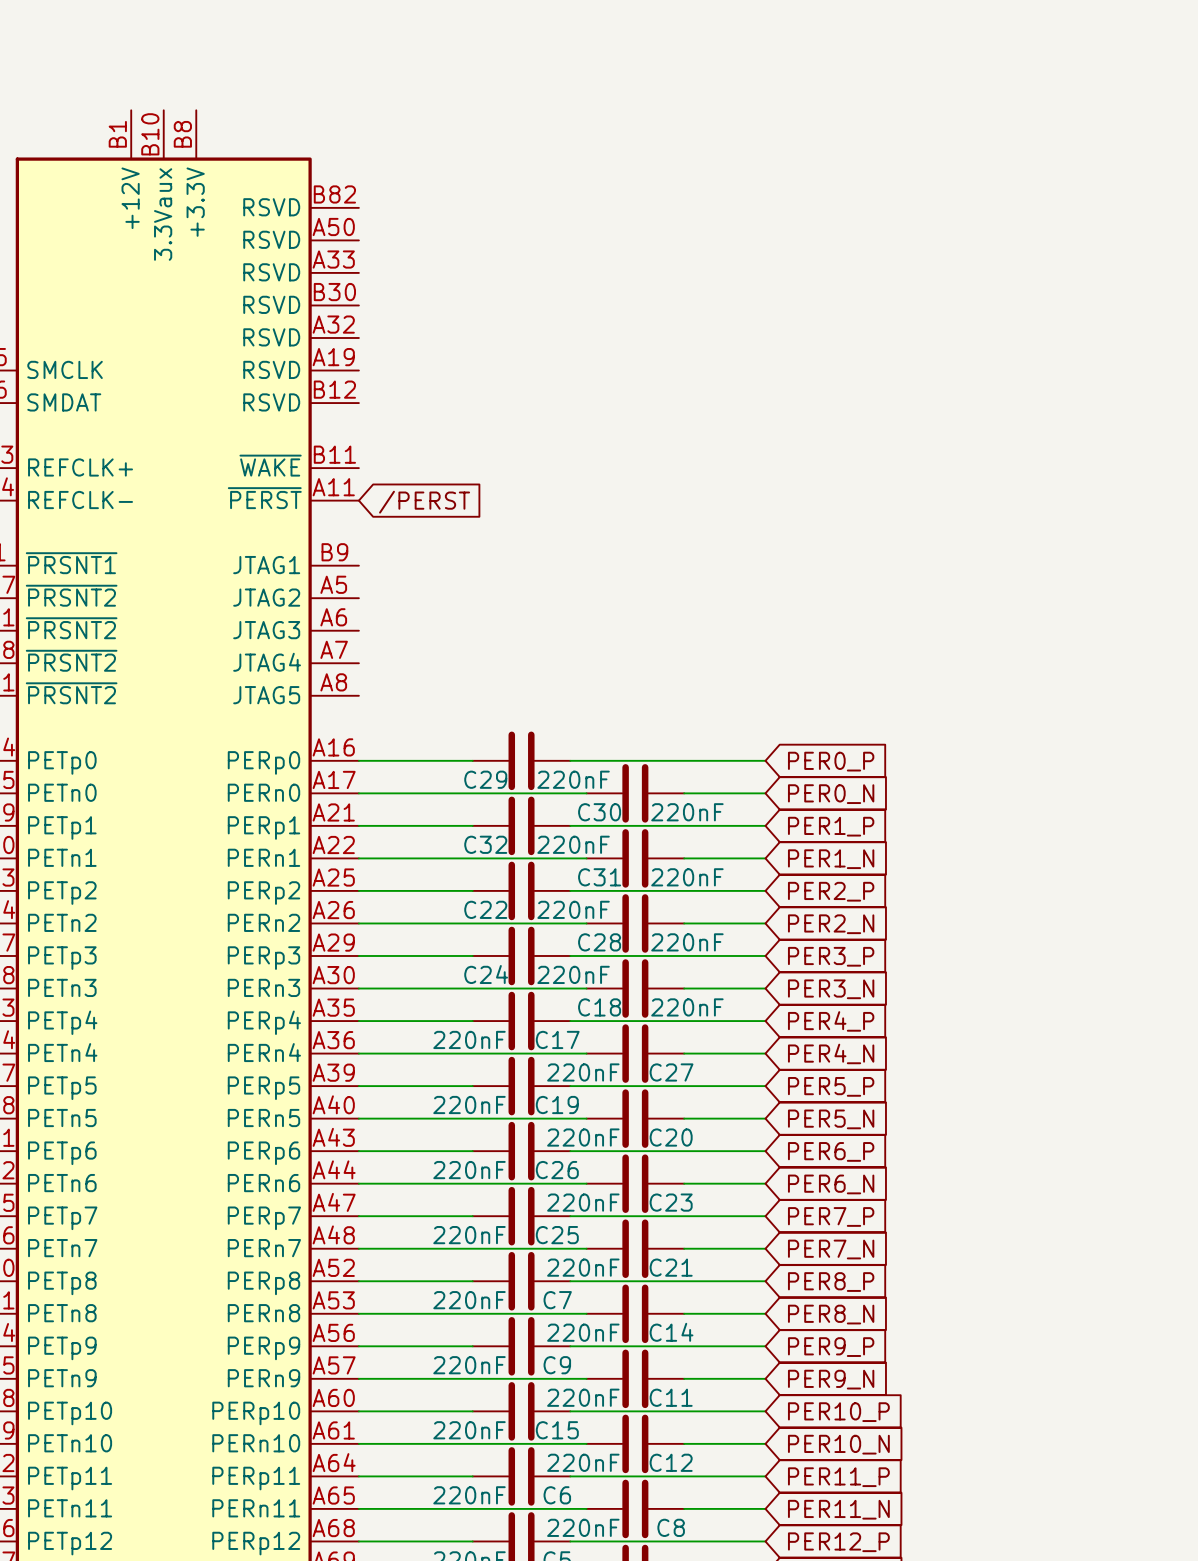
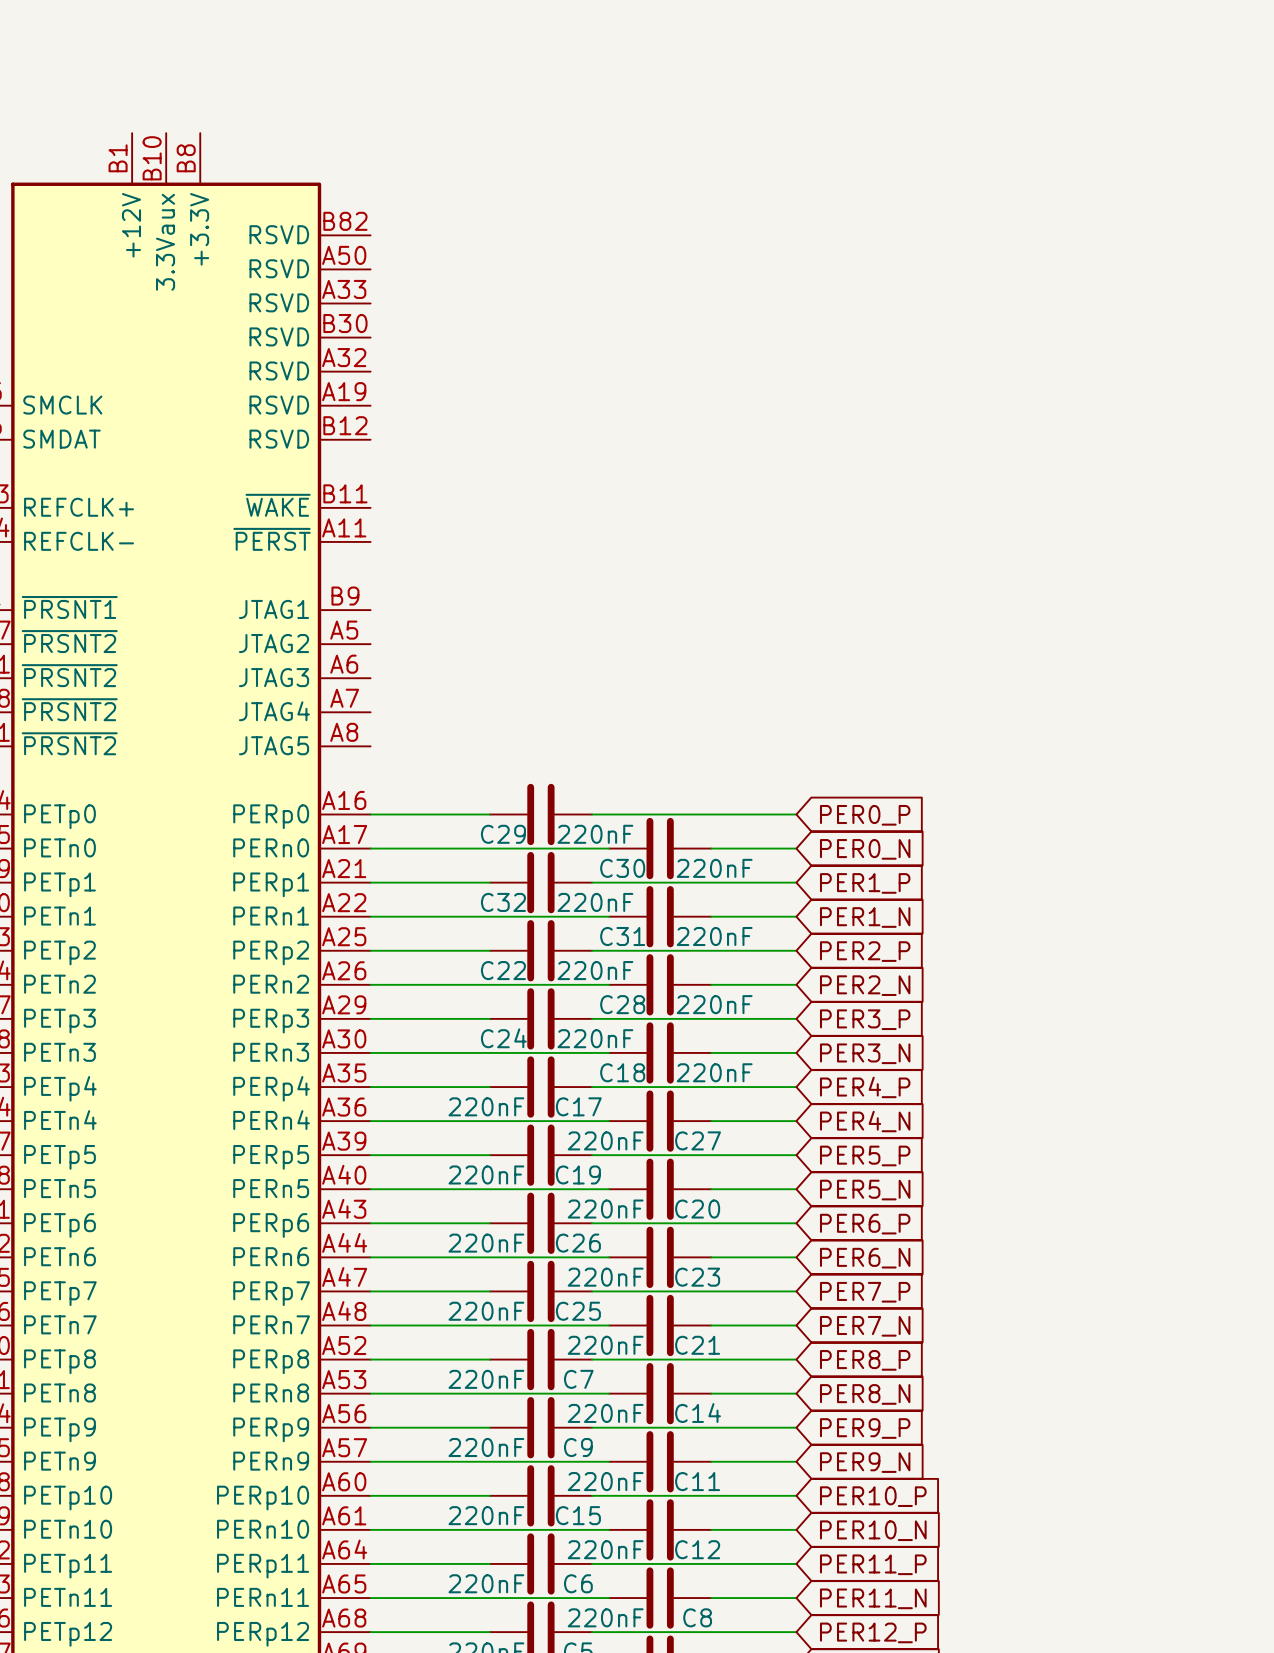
global label: /PERST (424, 502) -> none

